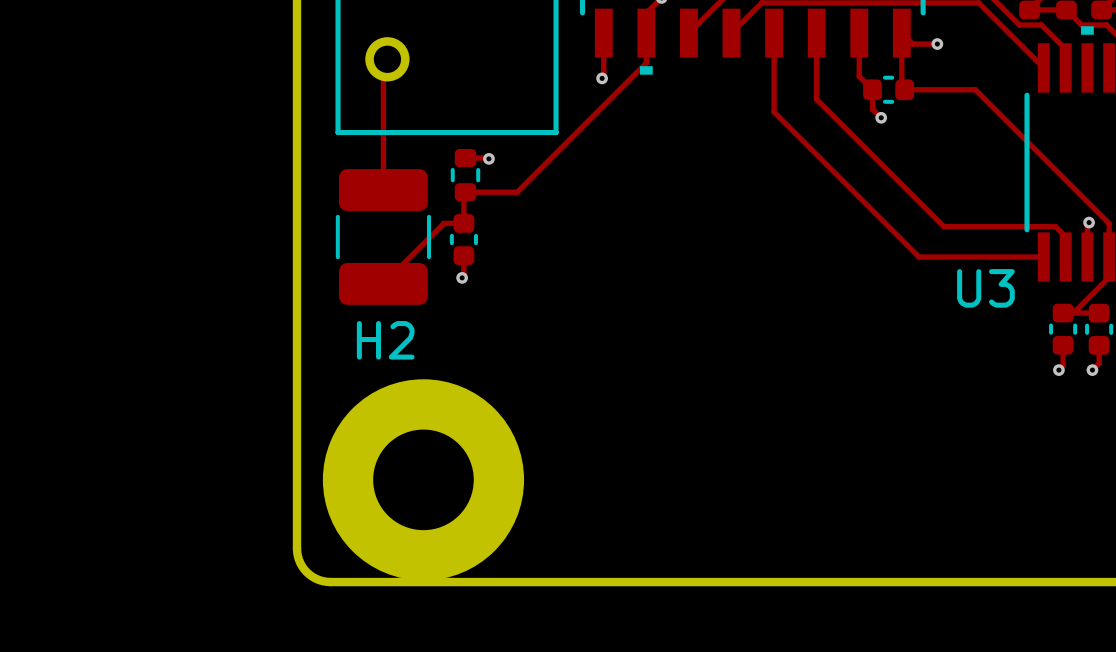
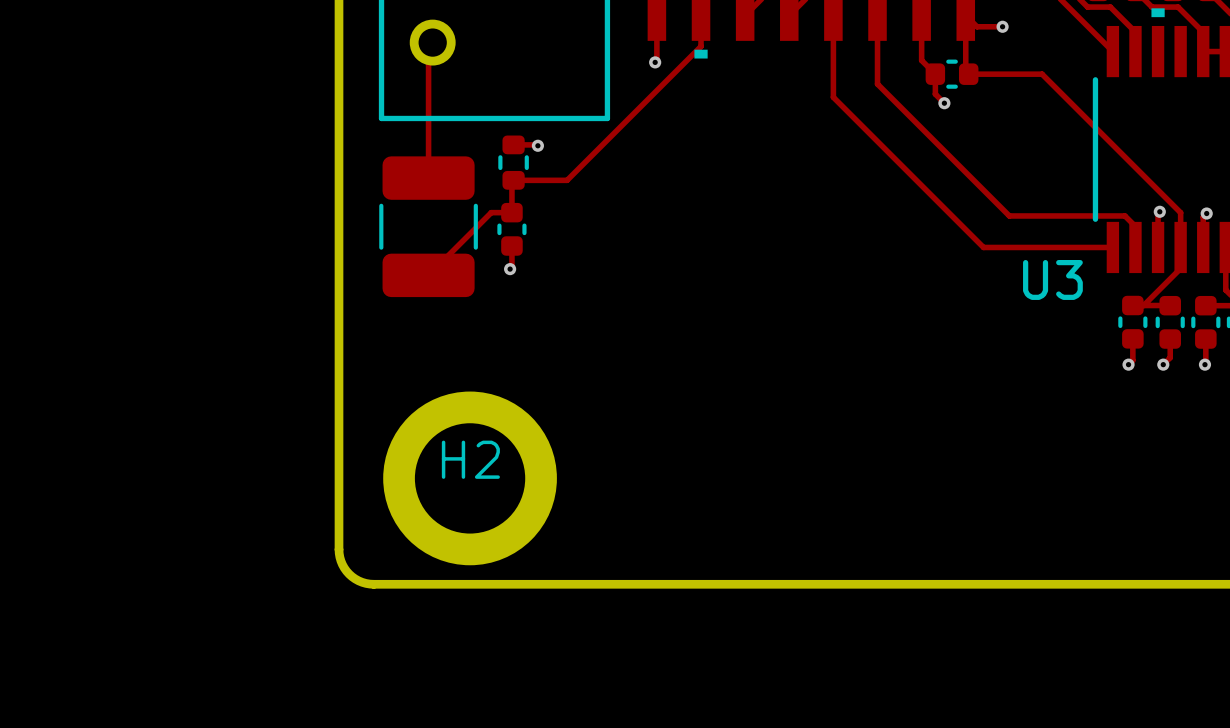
H2 name position: H2 (385, 340) -> H2 (470, 459)
H2 footprint: [322, 379, 525, 581] -> [383, 391, 557, 566]

